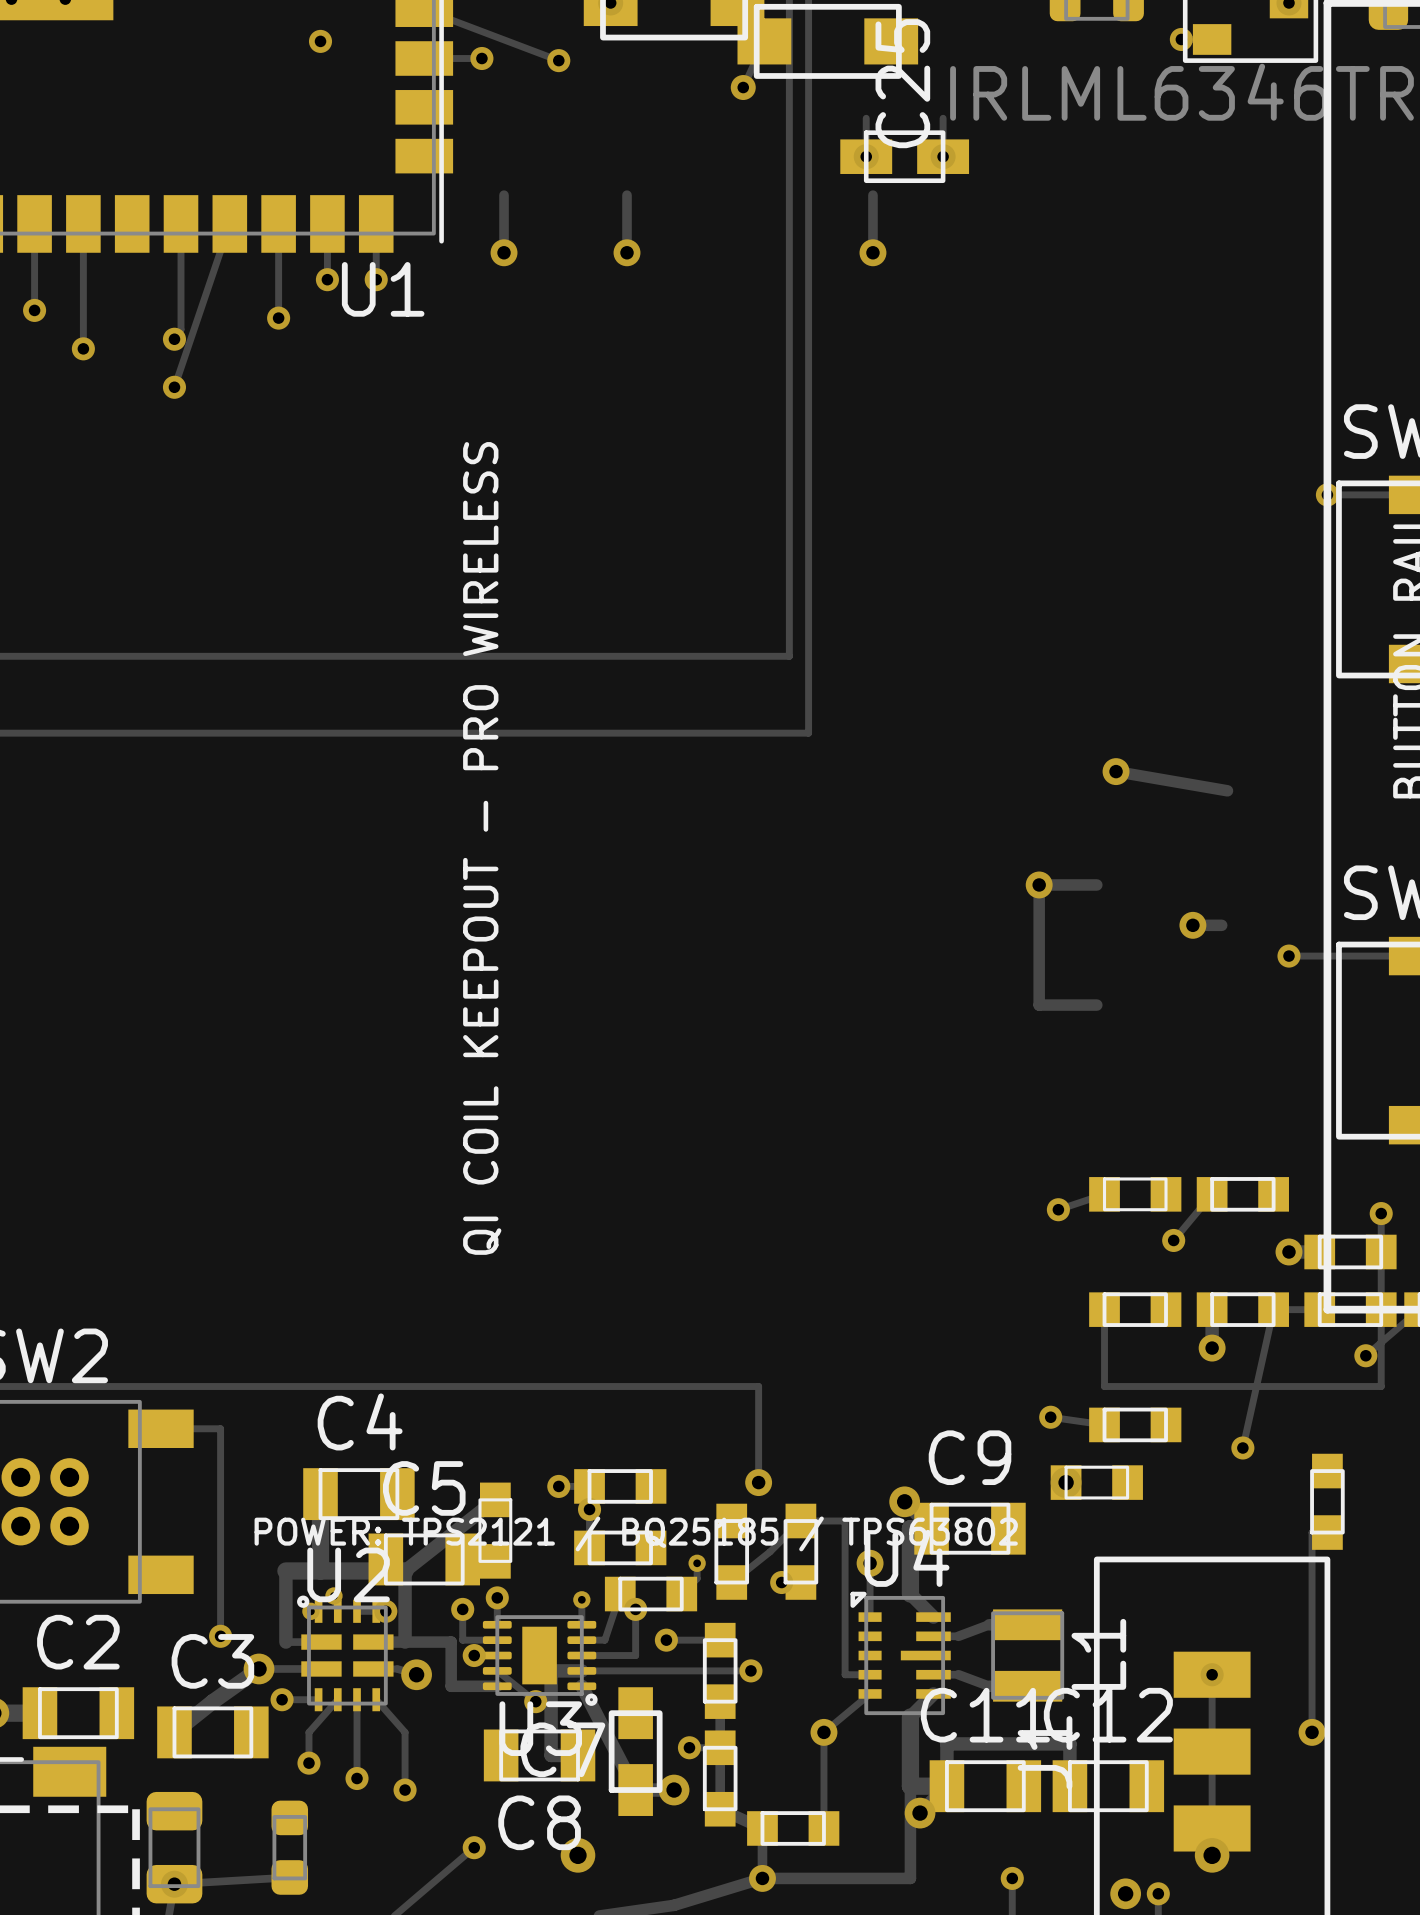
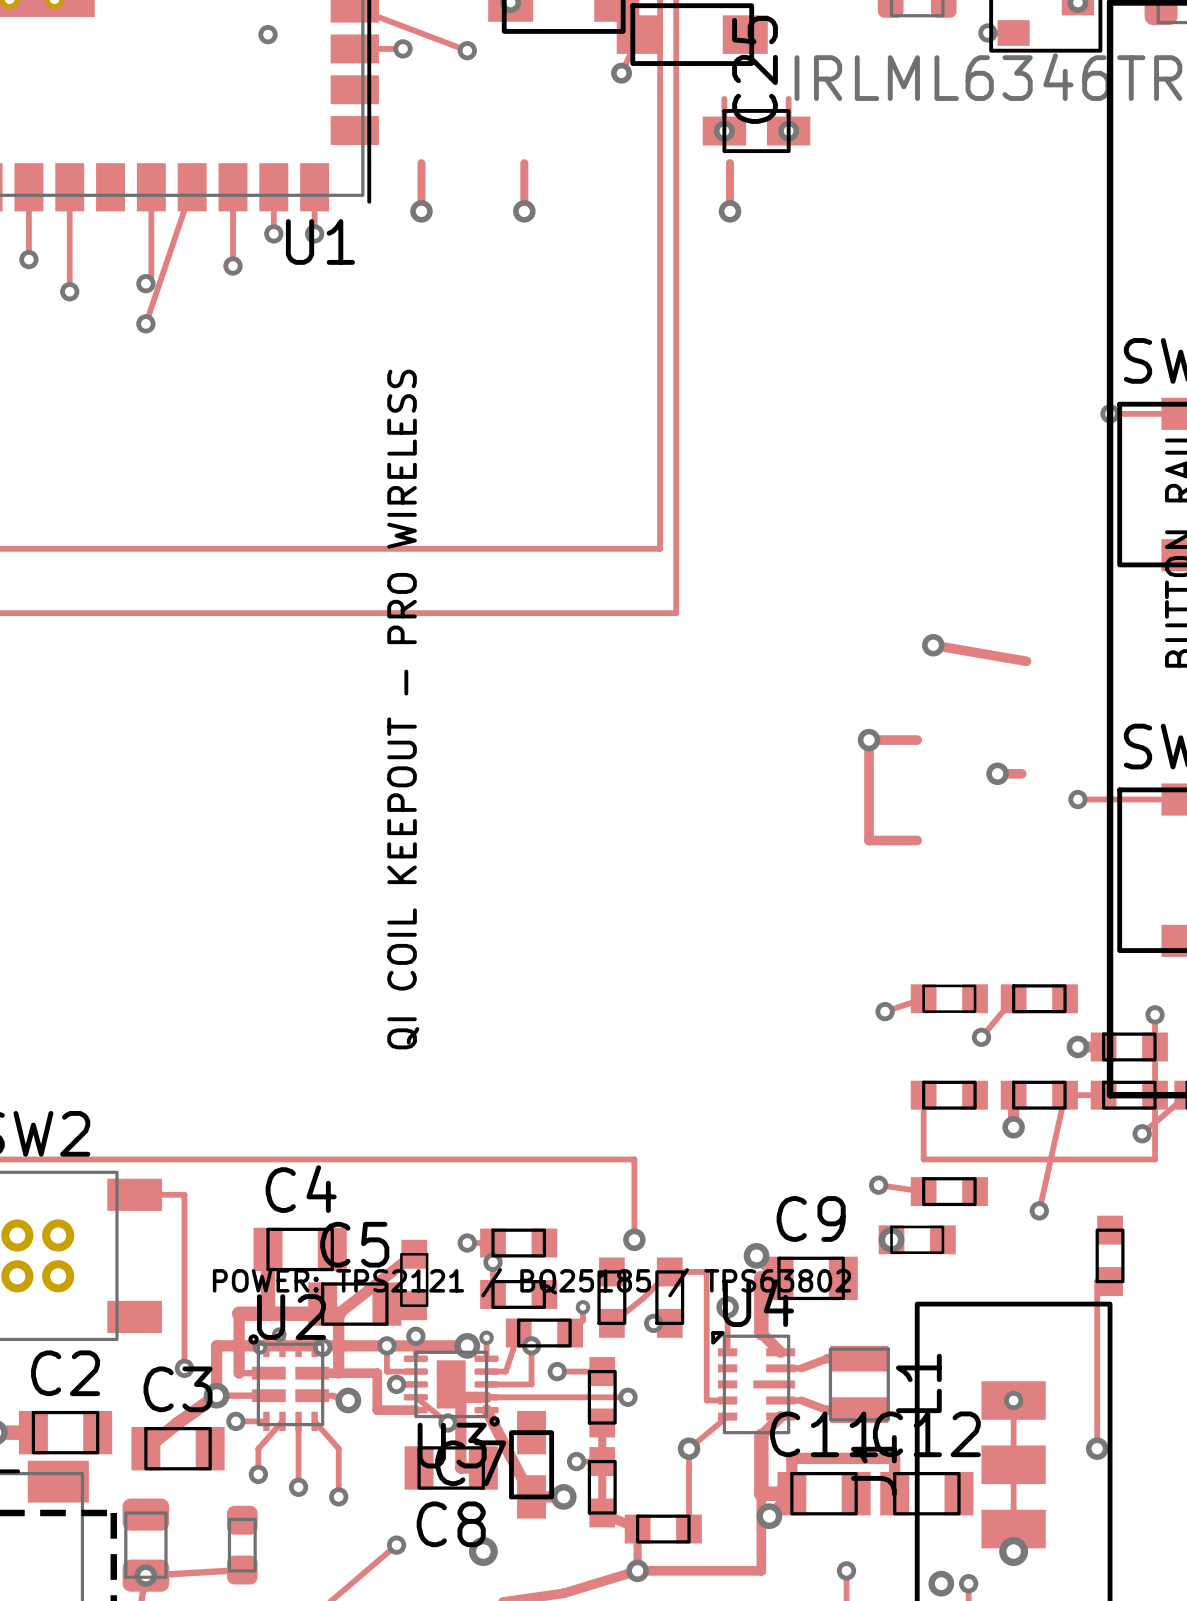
track: none -> (467, 1345) (216, 1345) (216, 1395)
via: none -> (467, 1345)

